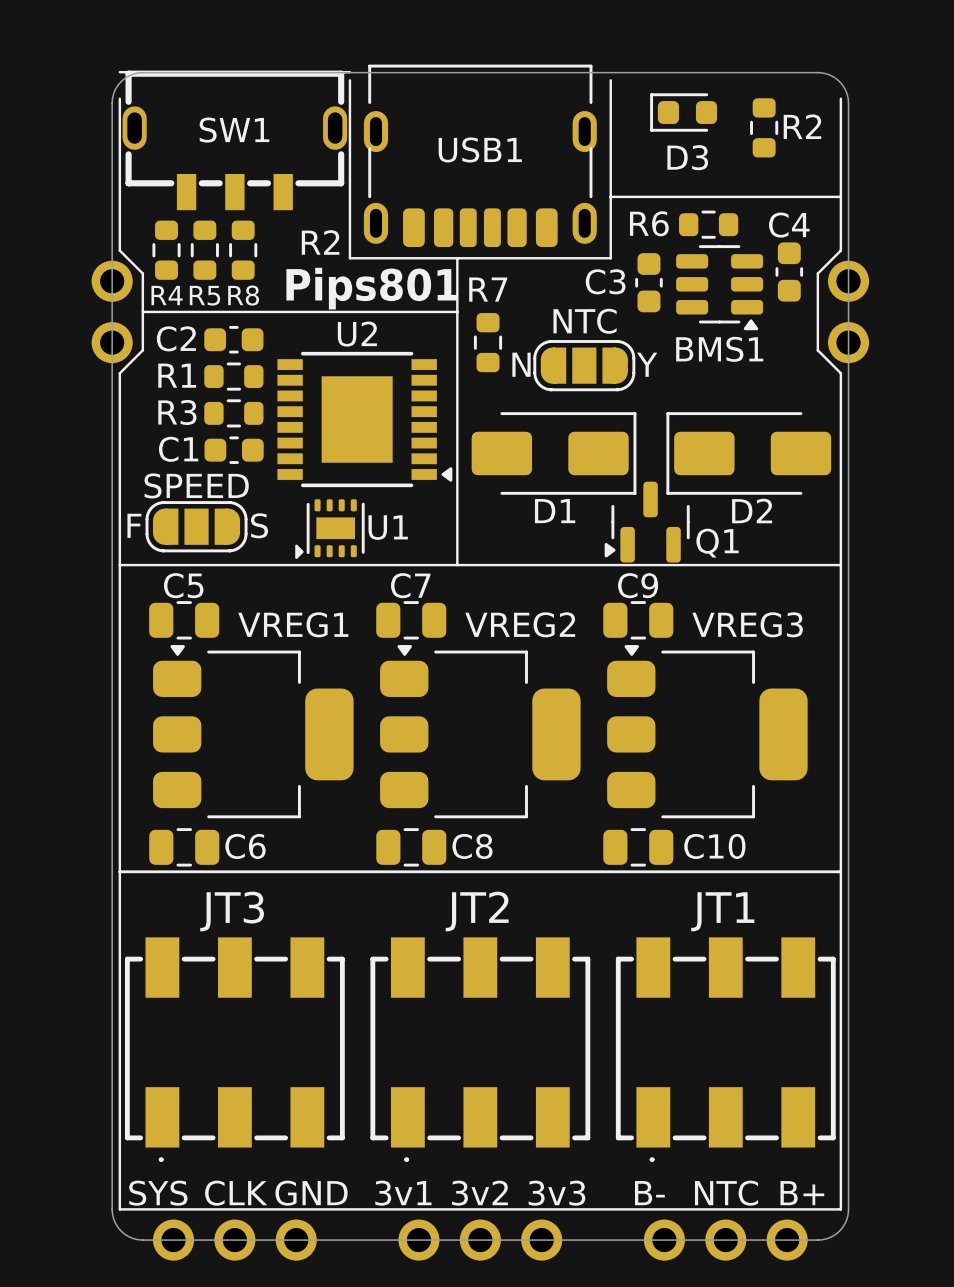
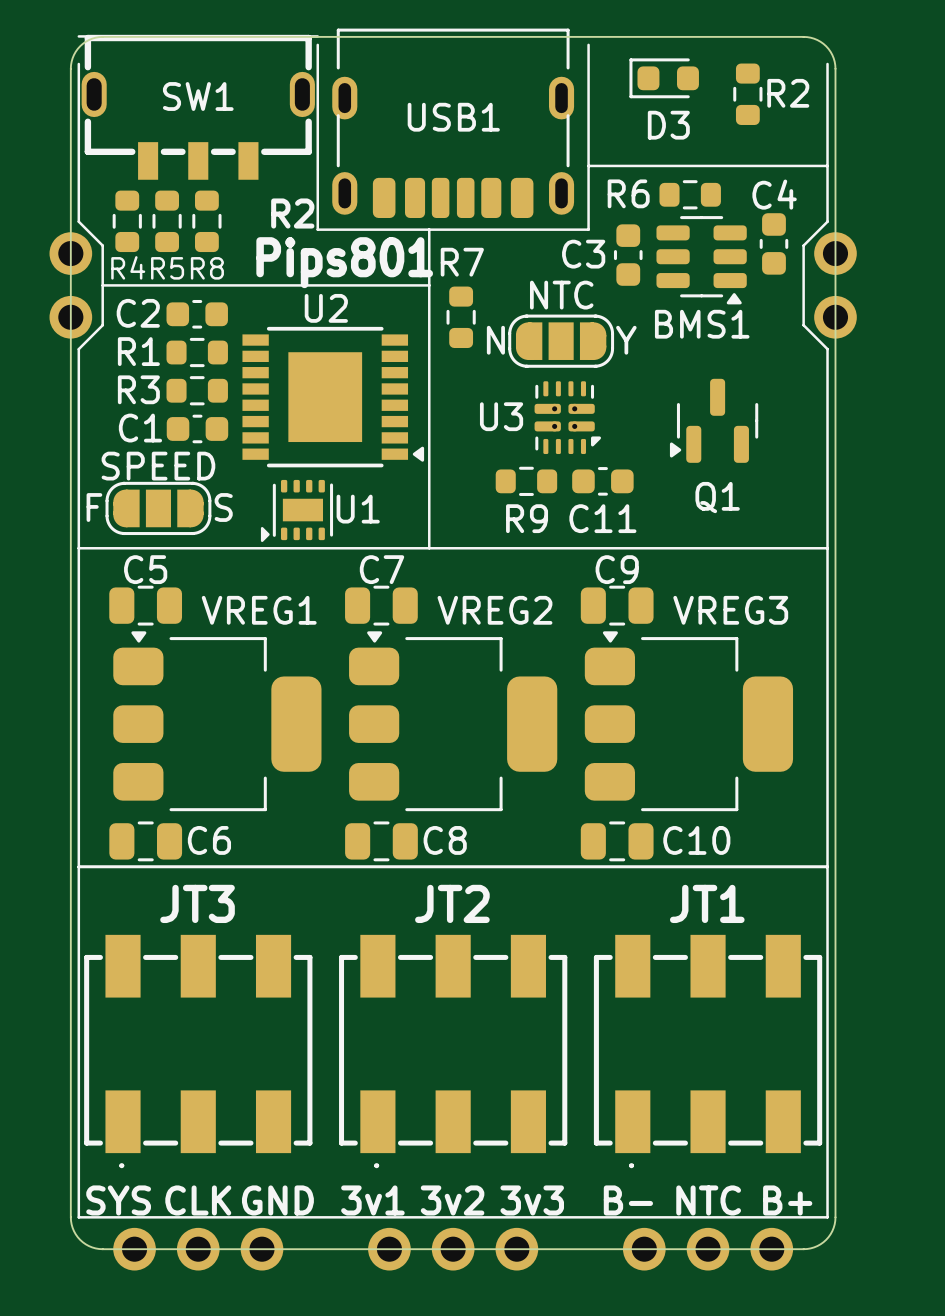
U3: none -> (567, 417)
D1: (554, 453) -> none
D2: (748, 453) -> none
R9: none -> (526, 481)
C11: none -> (602, 481)
Q1 position: (647, 522) -> (714, 420)
Q1 name position: Q1 (717, 543) -> Q1 (717, 497)

